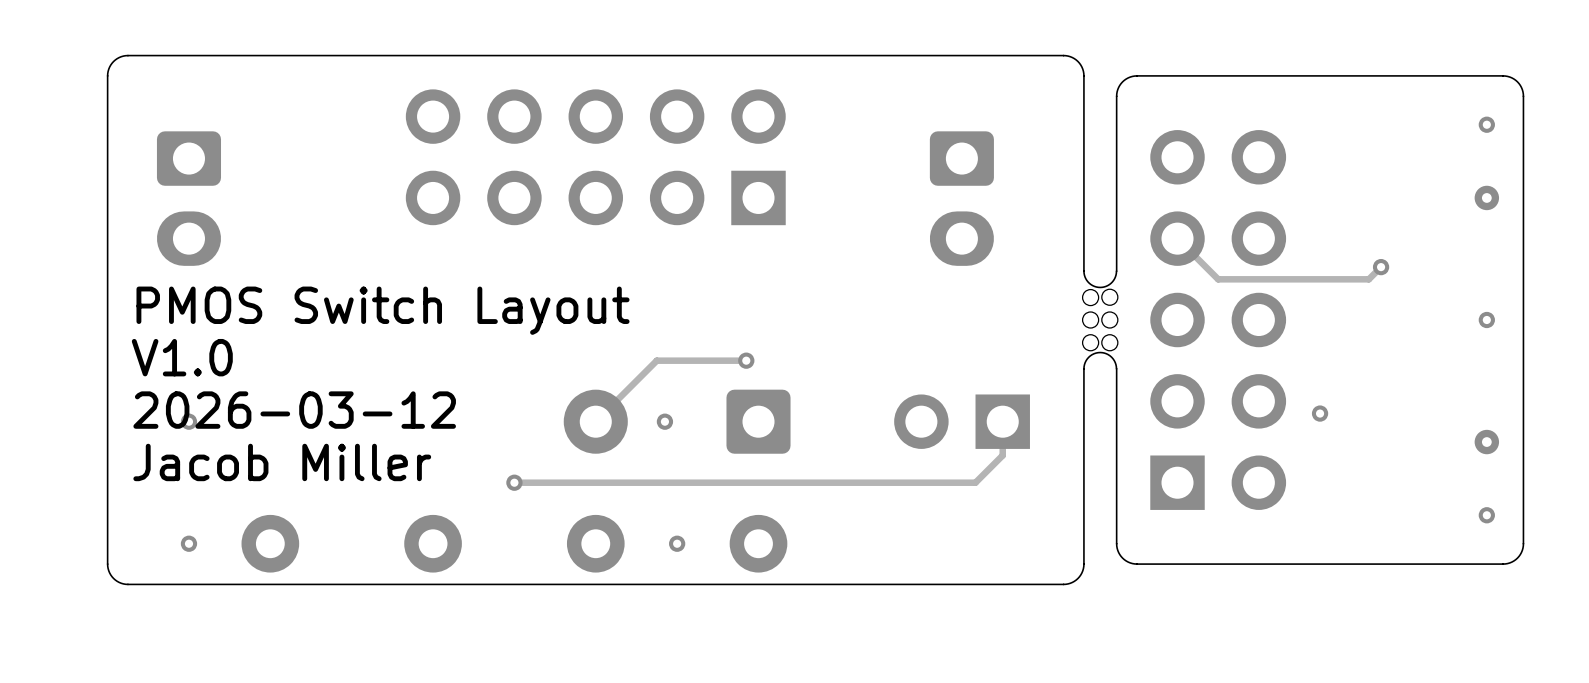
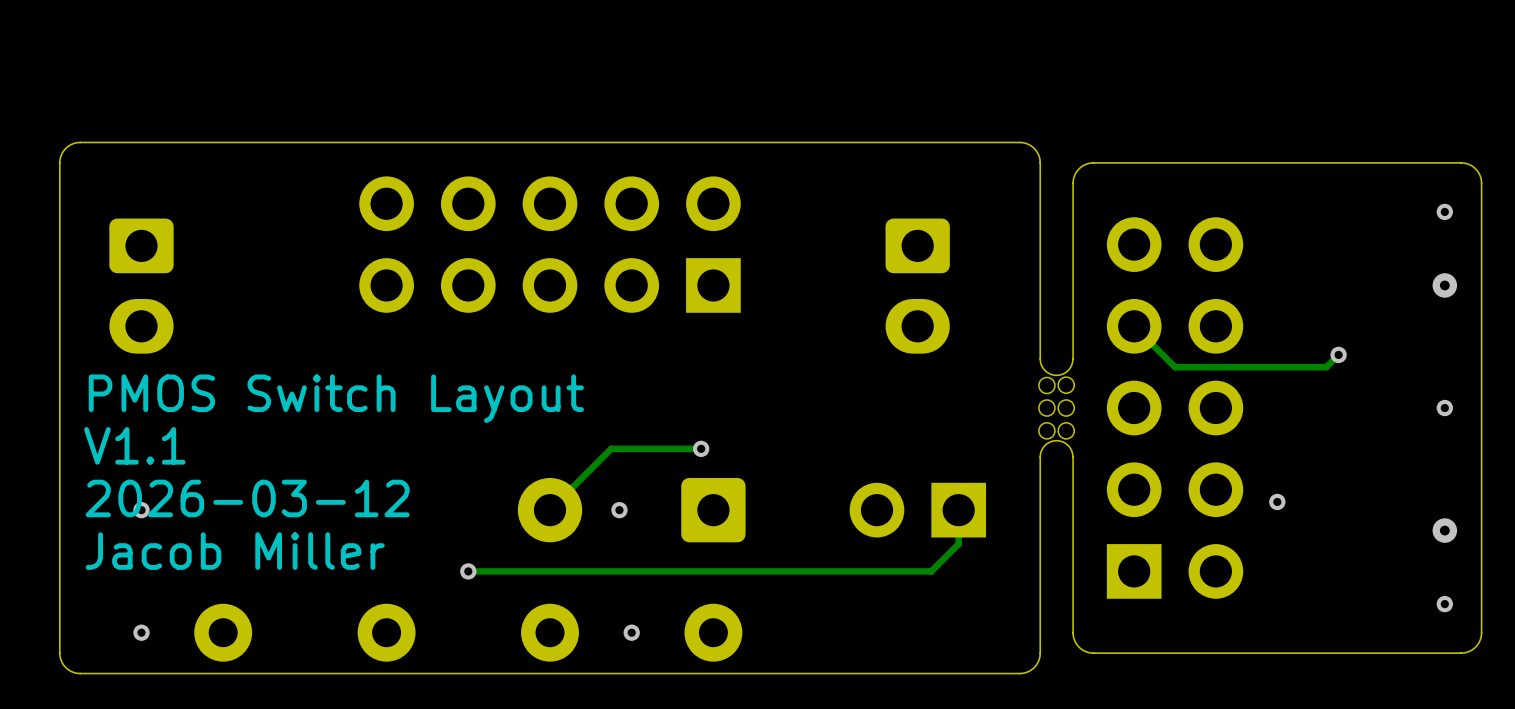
text: V1.0 (182, 357) -> V1.1 (134, 445)

